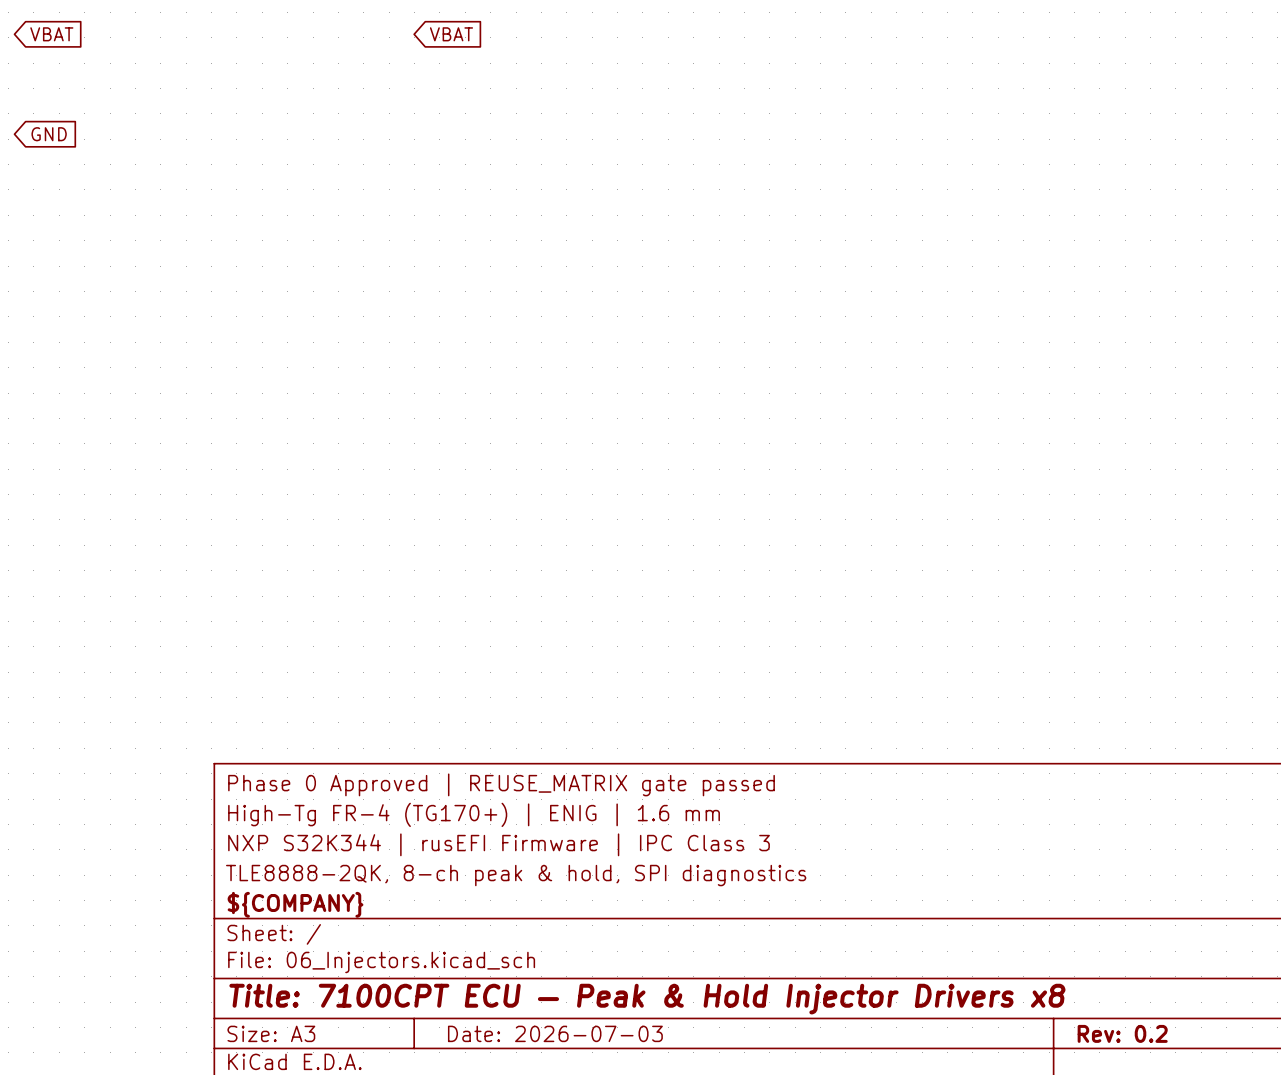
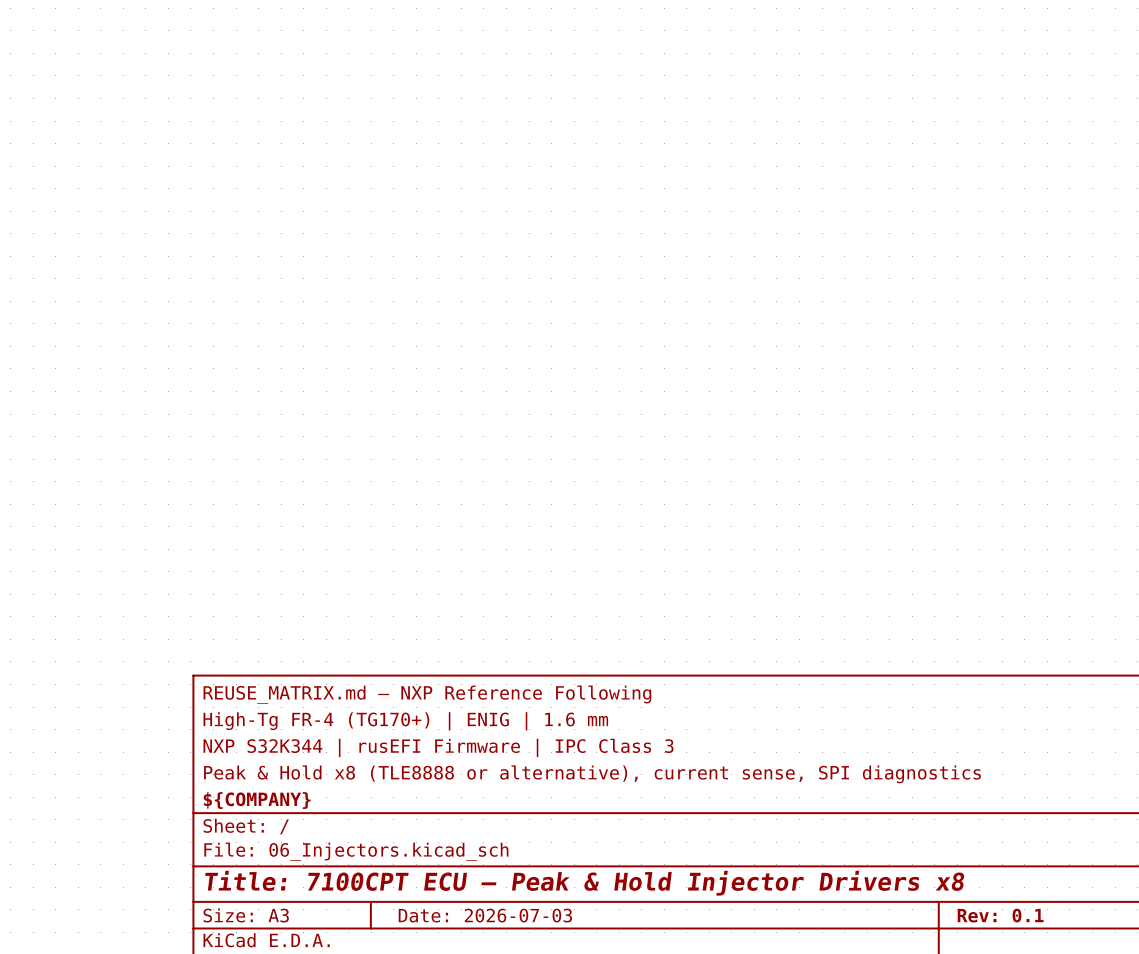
global label: VBAT (51, 34) -> none
global label: VBAT (451, 34) -> none
global label: GND (49, 134) -> none
title block: Phase 0 Approved | REUSE_MATRIX gate passed (501, 784) -> REUSE_MATRIX.md — NXP Reference Following (427, 694)
title block: TLE8888-2QK, 8-ch peak & hold, SPI diagnostics (516, 875) -> Peak & Hold x8 (TLE8888 or alternative), current sense, SPI diagnostics (592, 774)
title block: Rev: 0.2 (1122, 1033) -> Rev: 0.1 (1000, 915)

